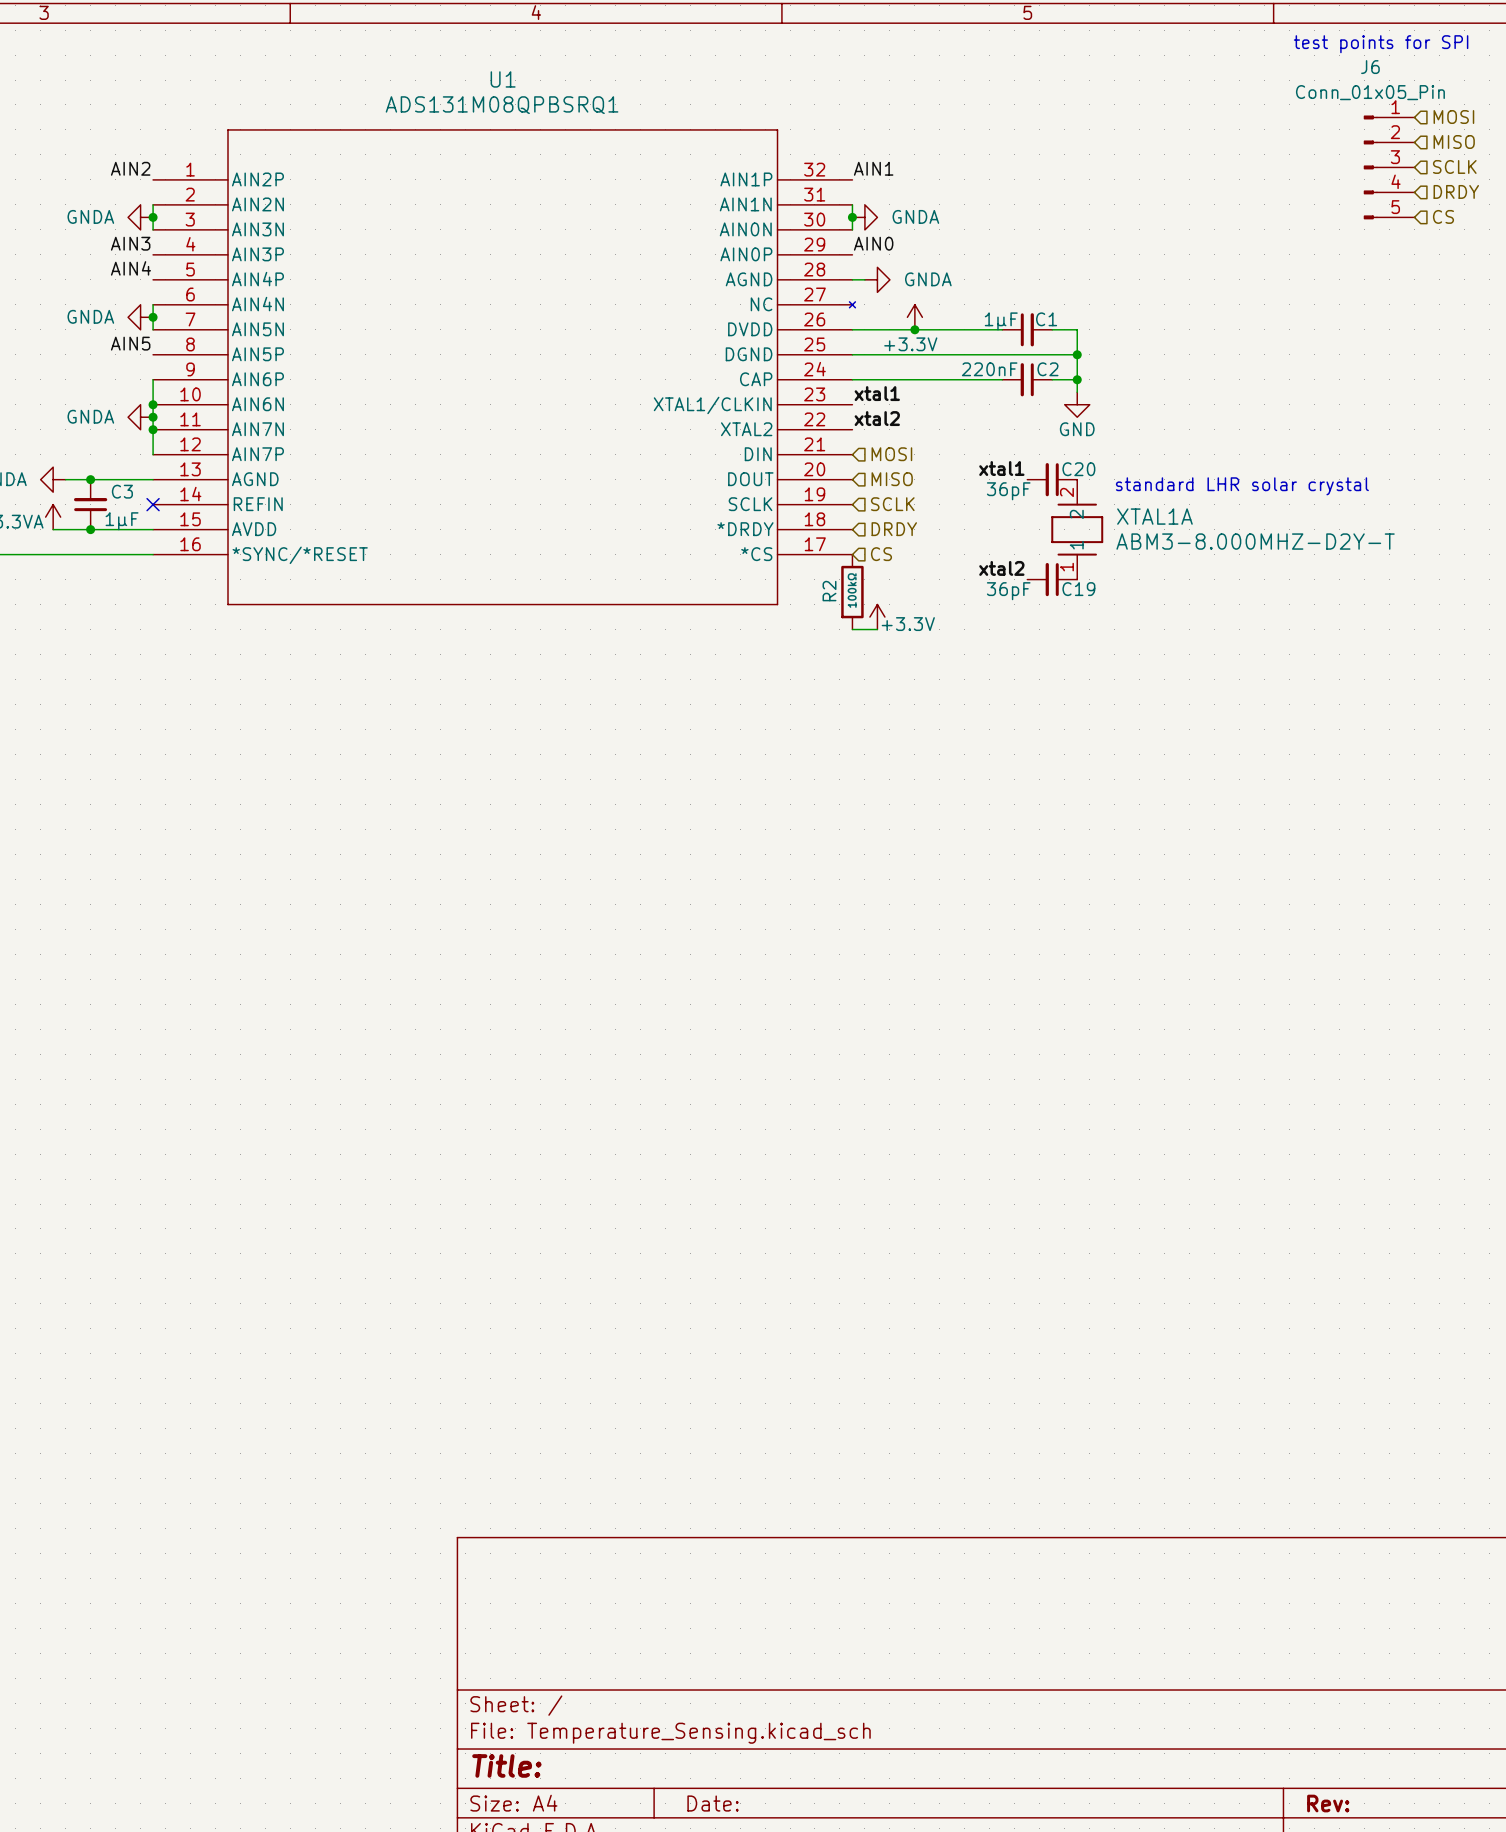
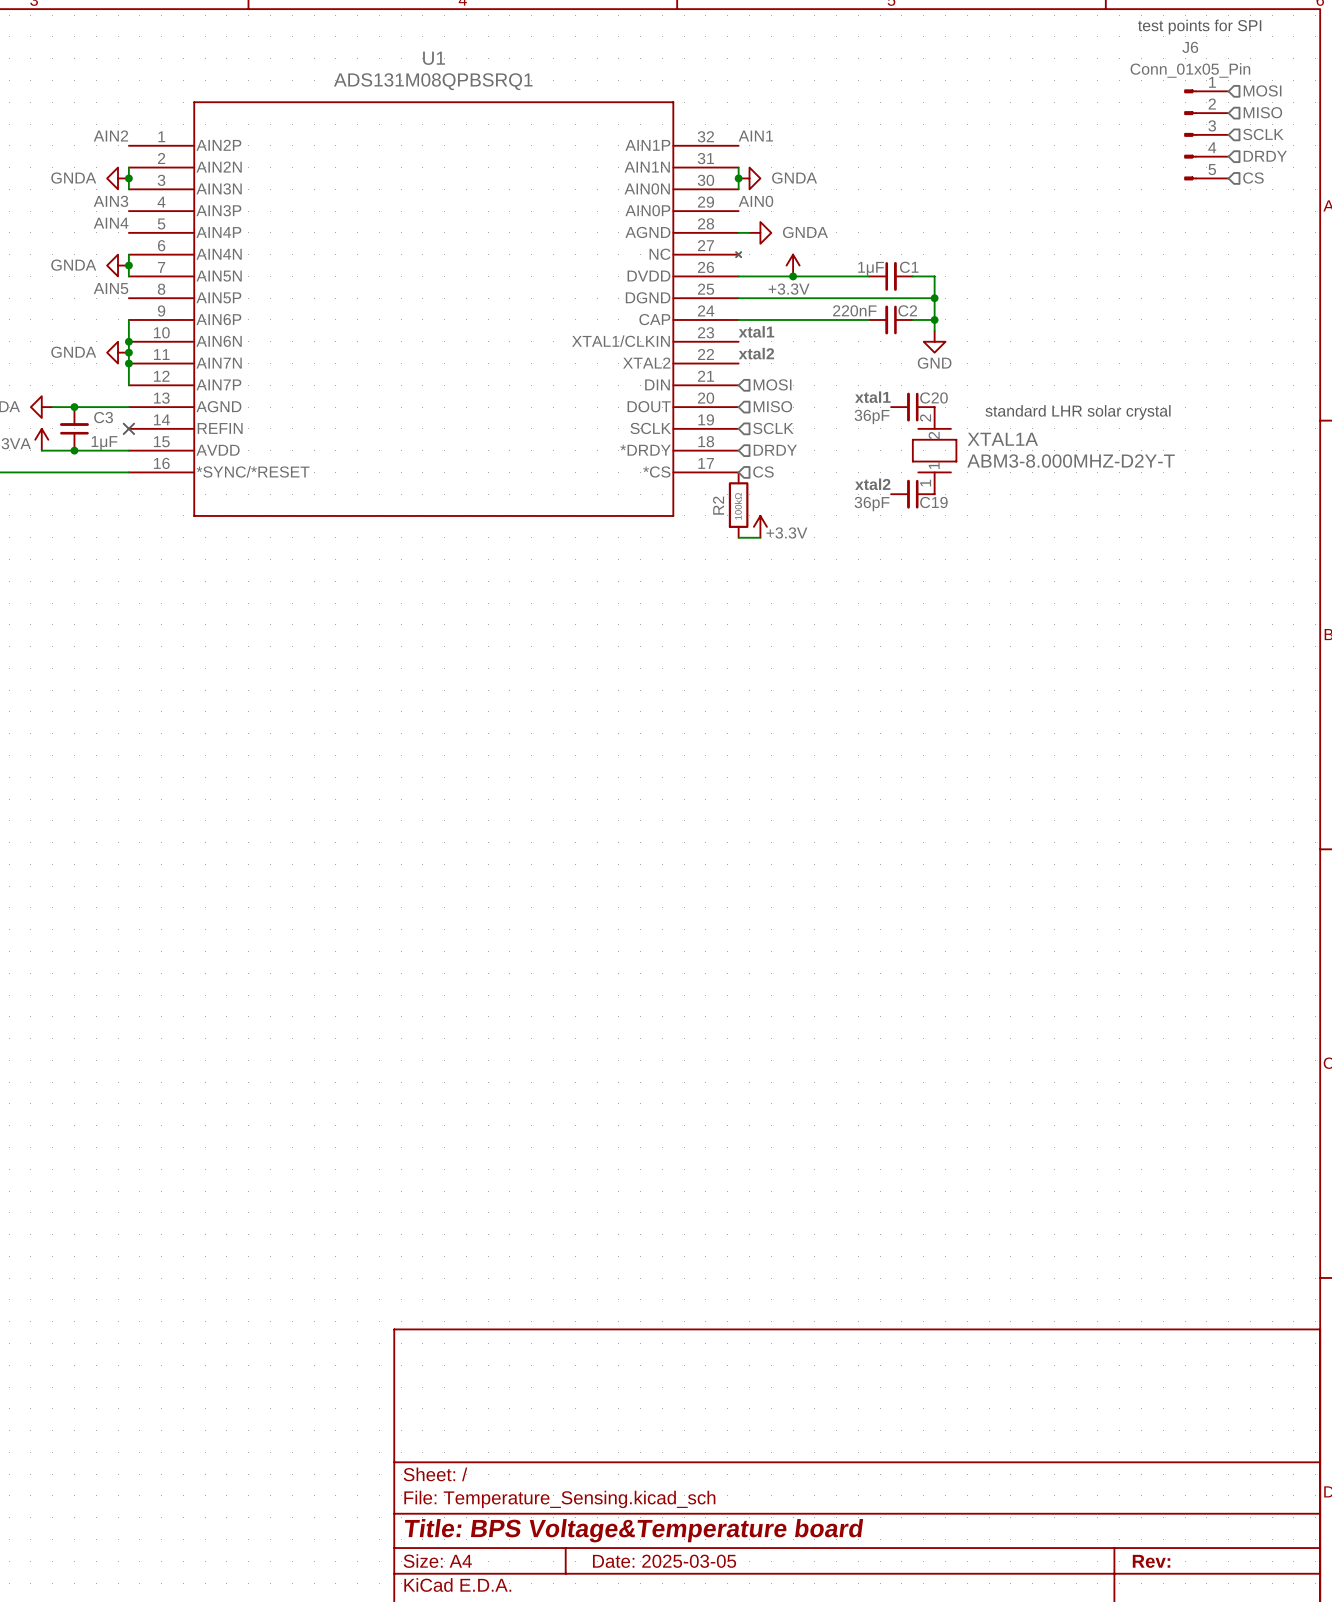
title block: Title: (506, 1765) -> Title: BPS Voltage&Temperature board (634, 1530)
title block: Date: (713, 1803) -> Date: 2025-03-05 (664, 1561)

